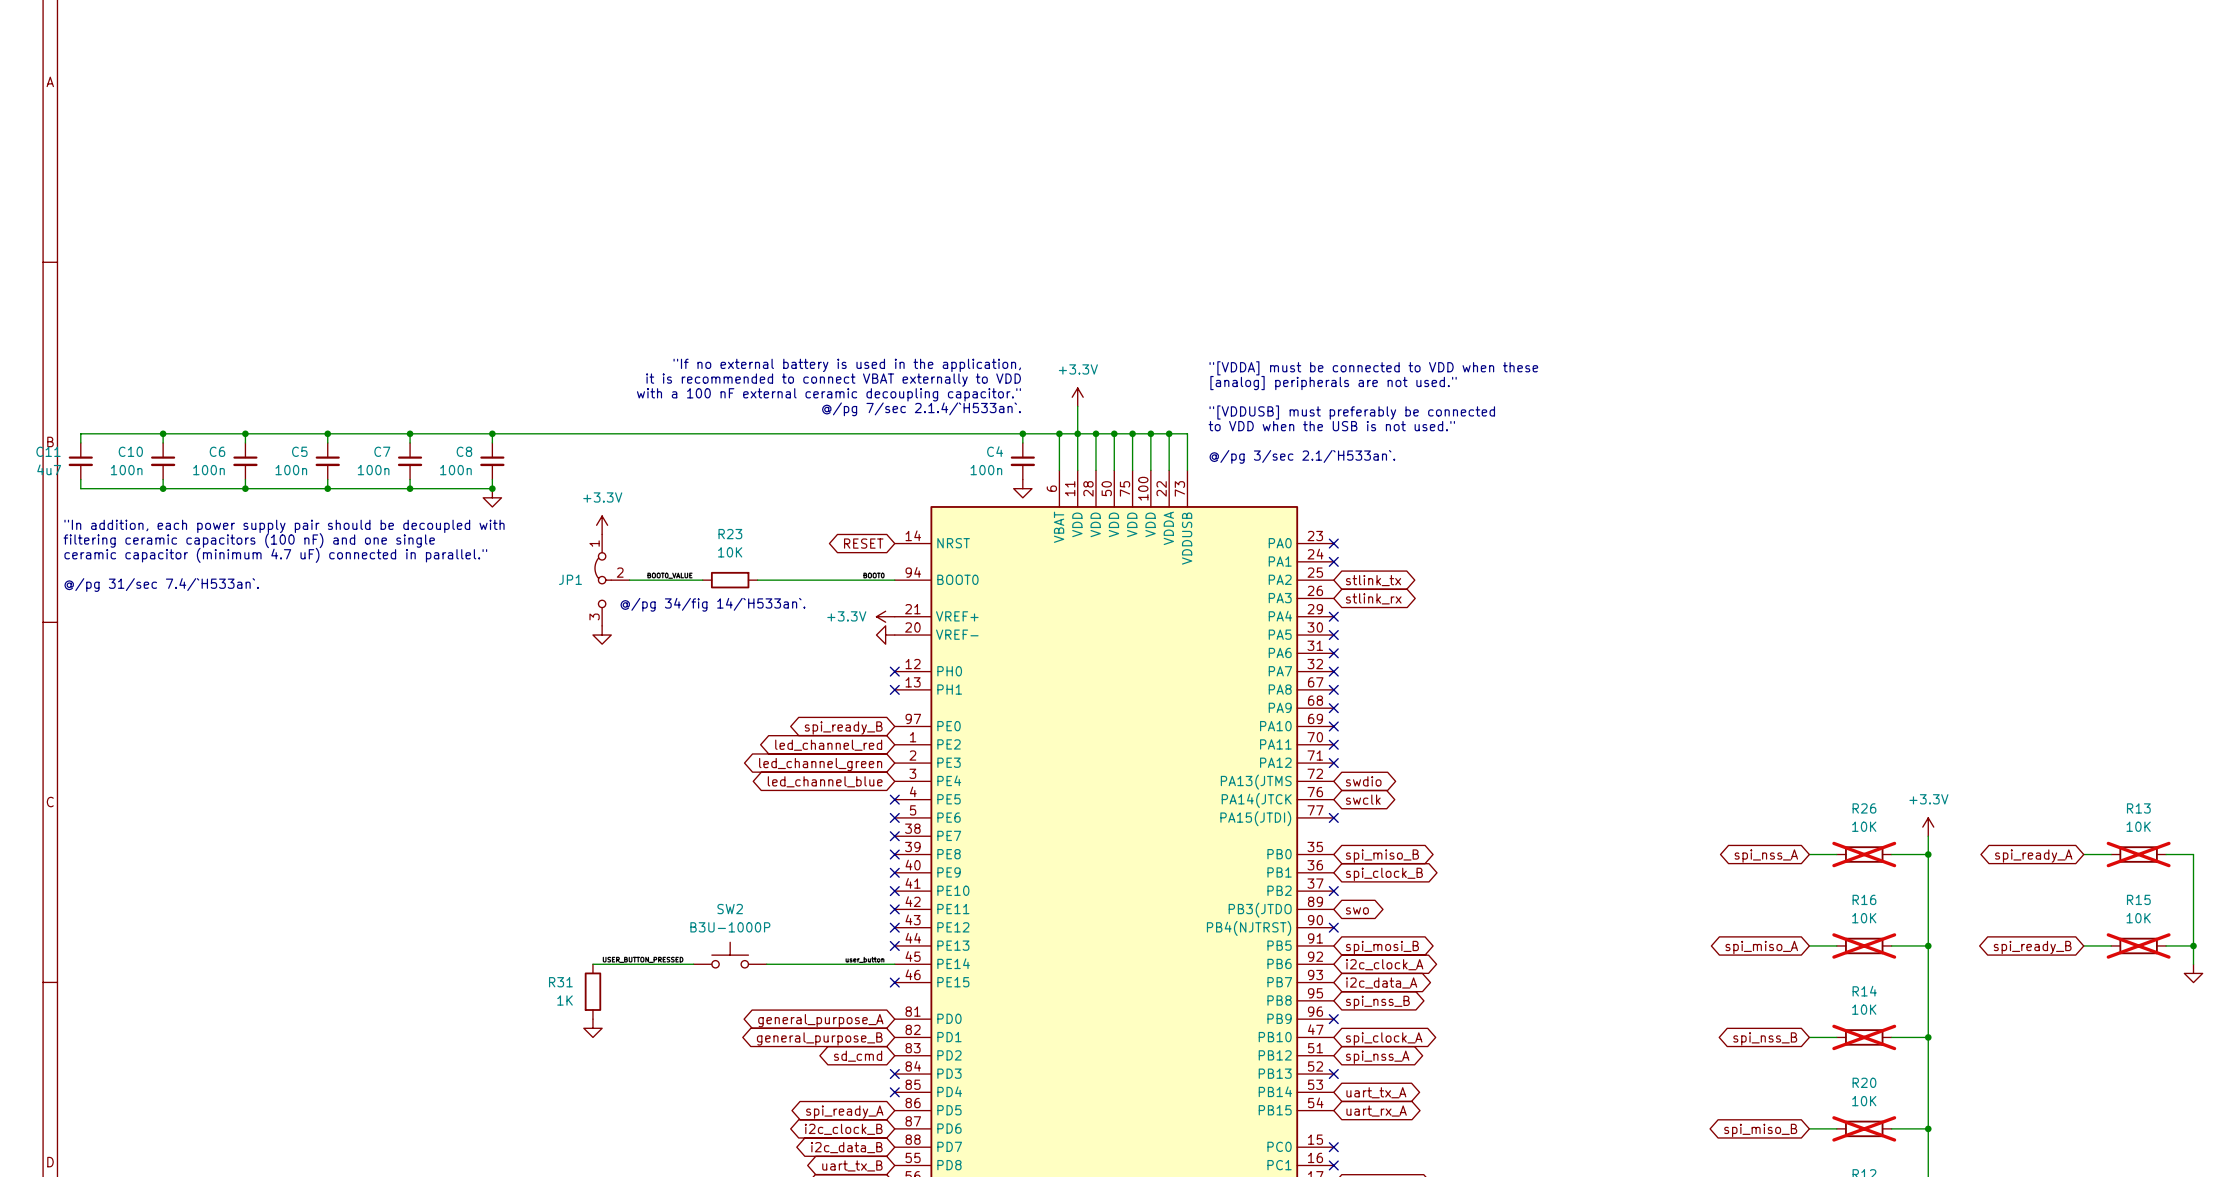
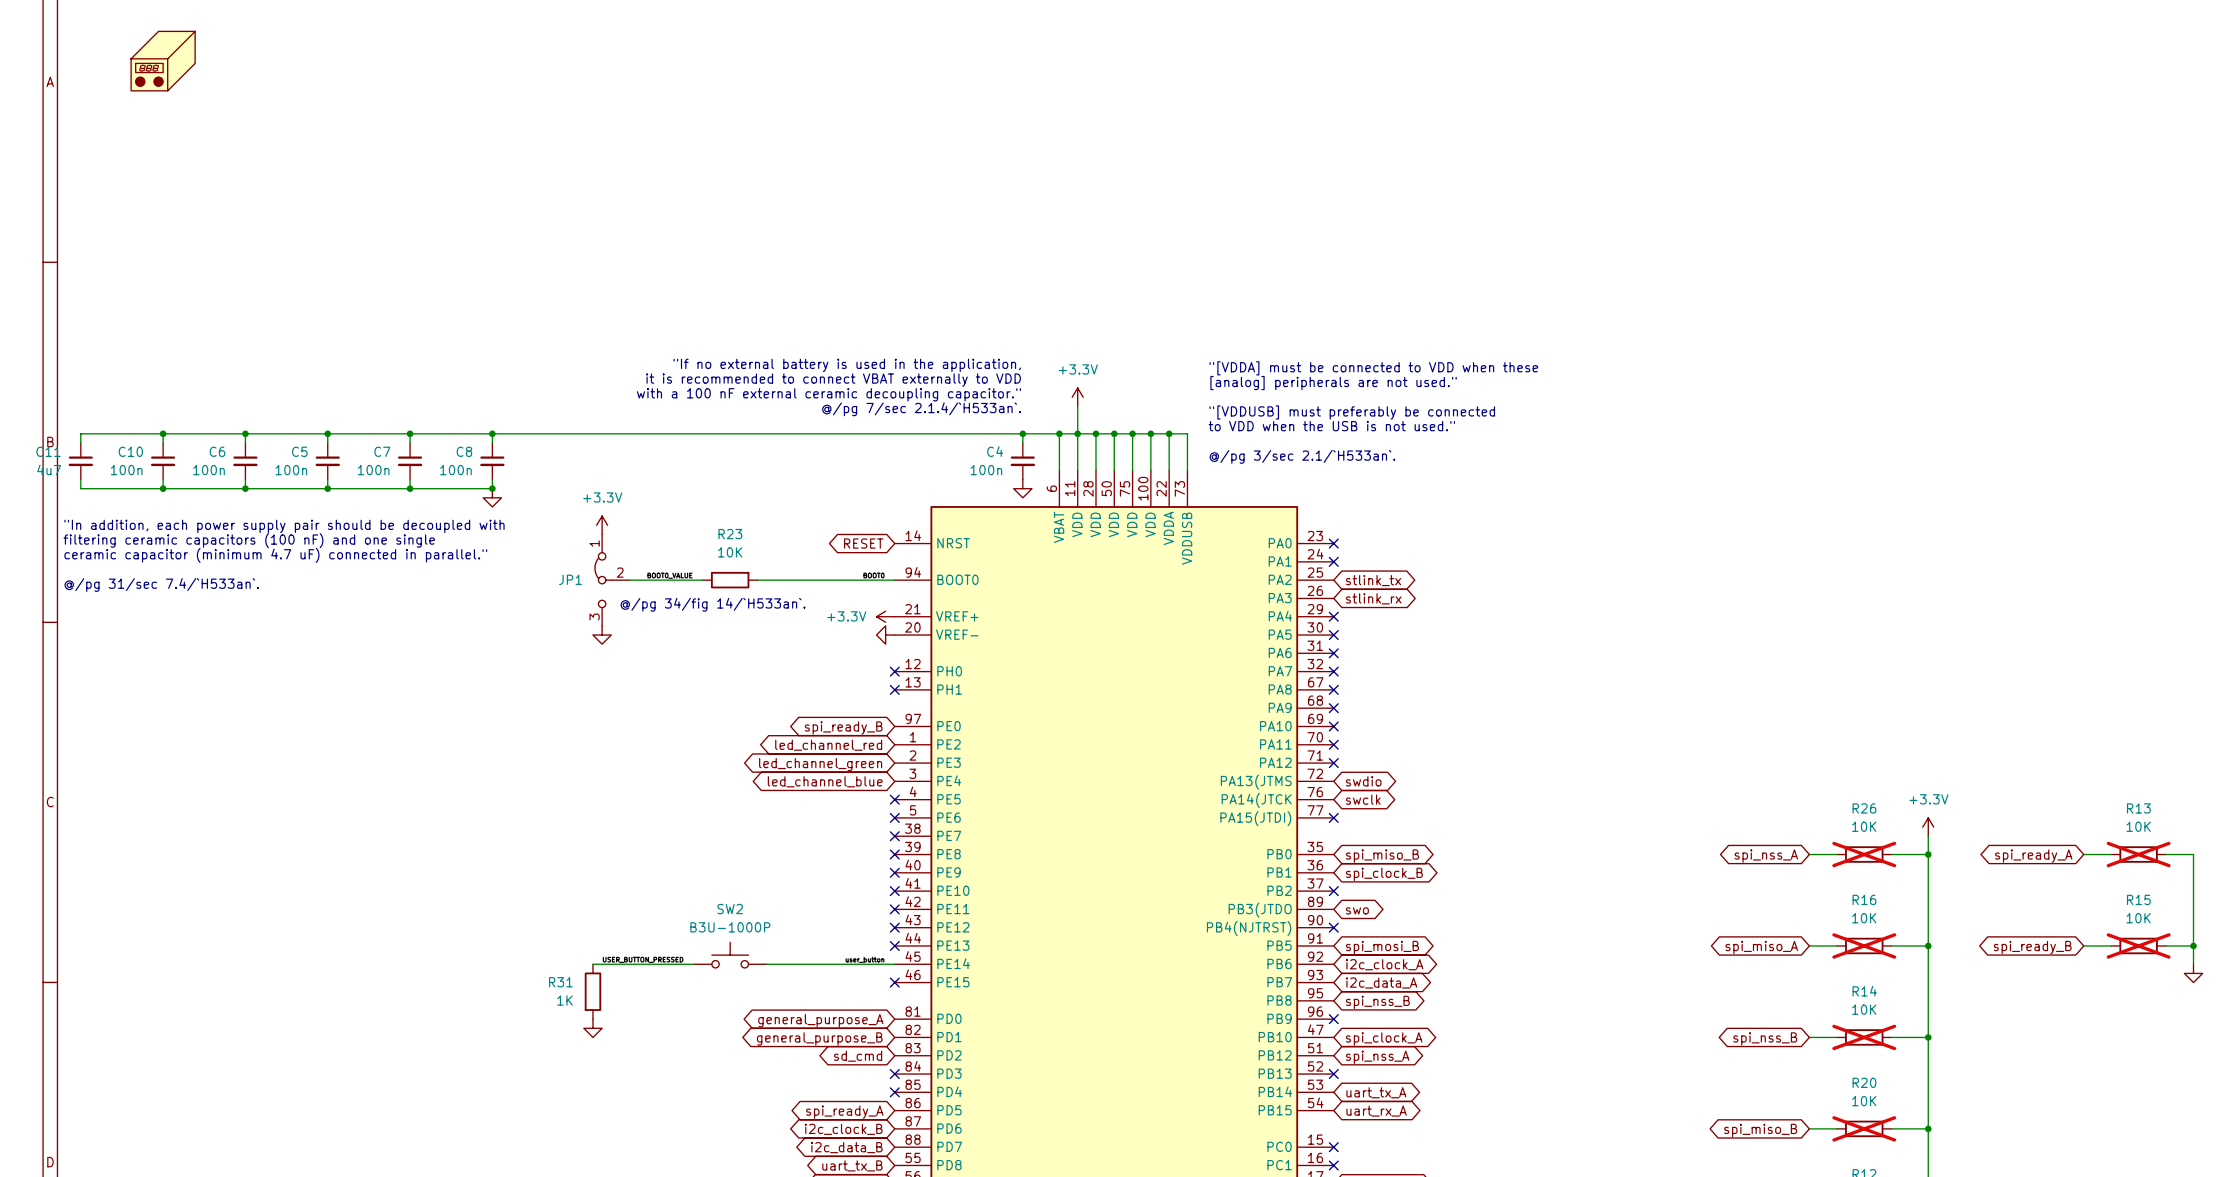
part: none -> (163, 61)

